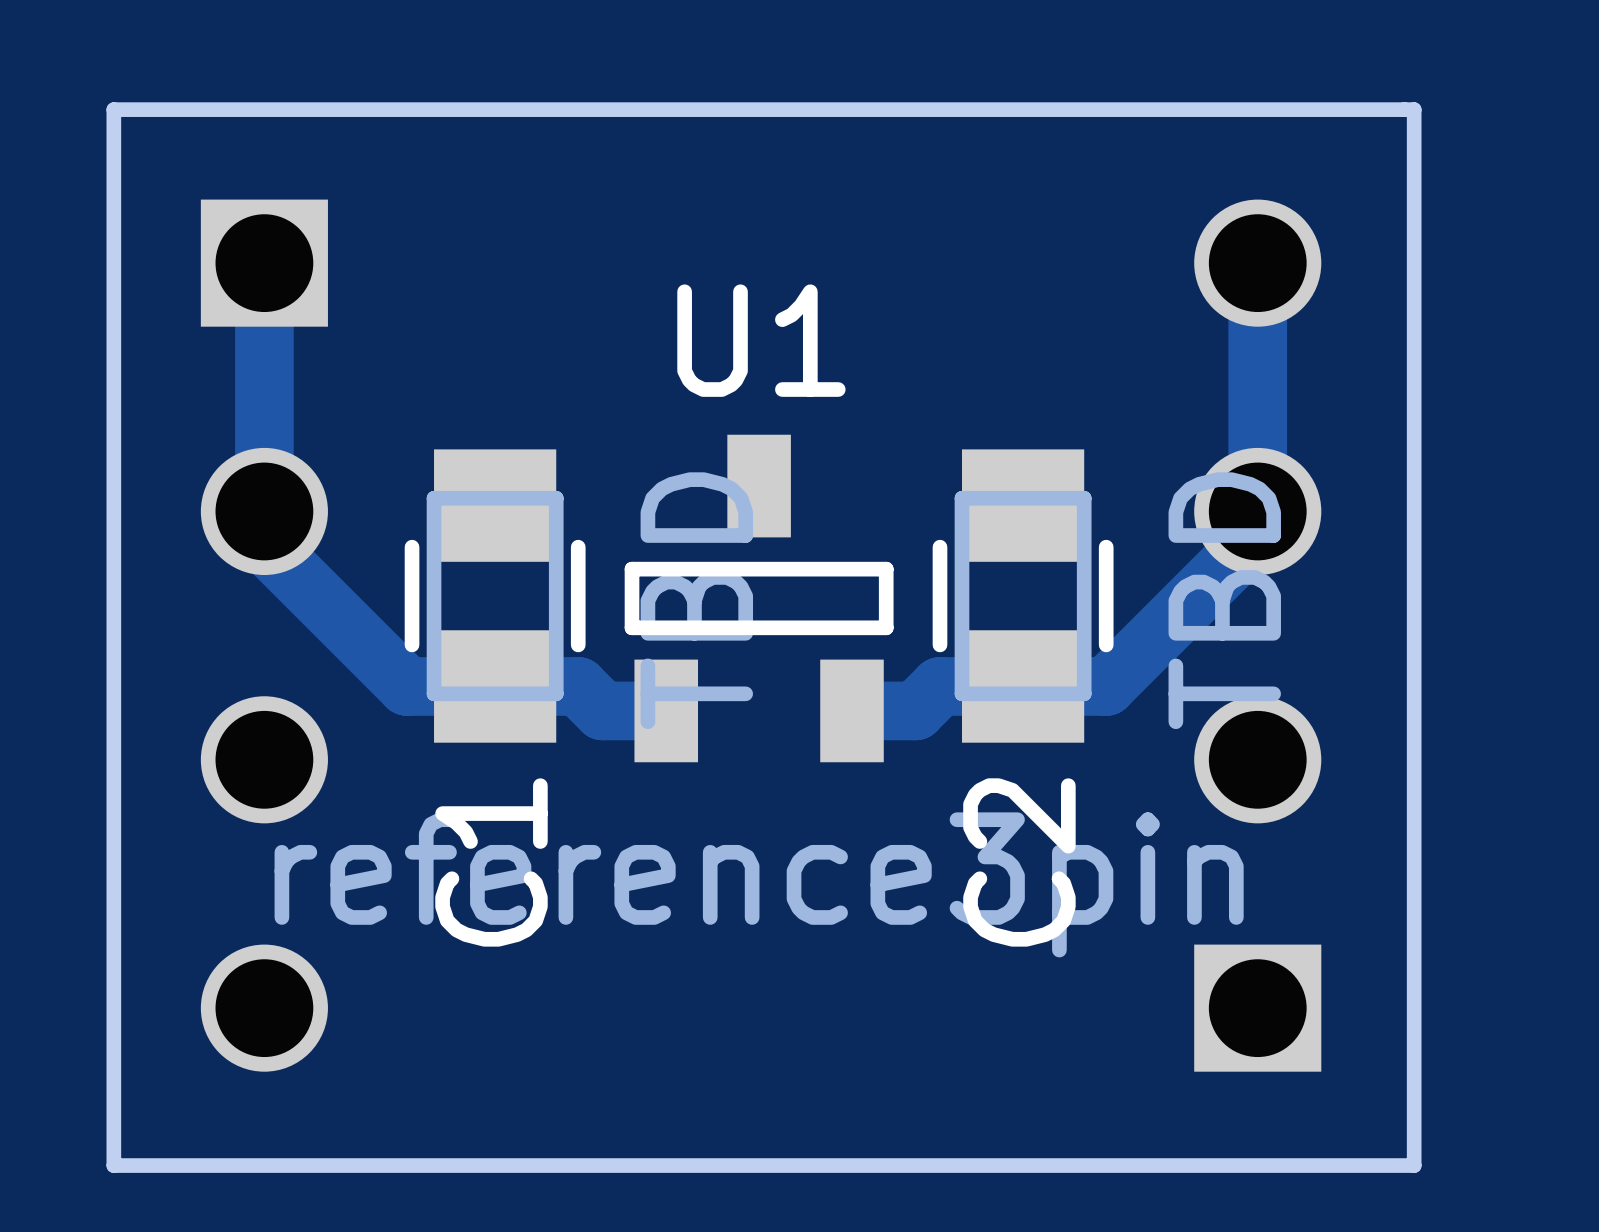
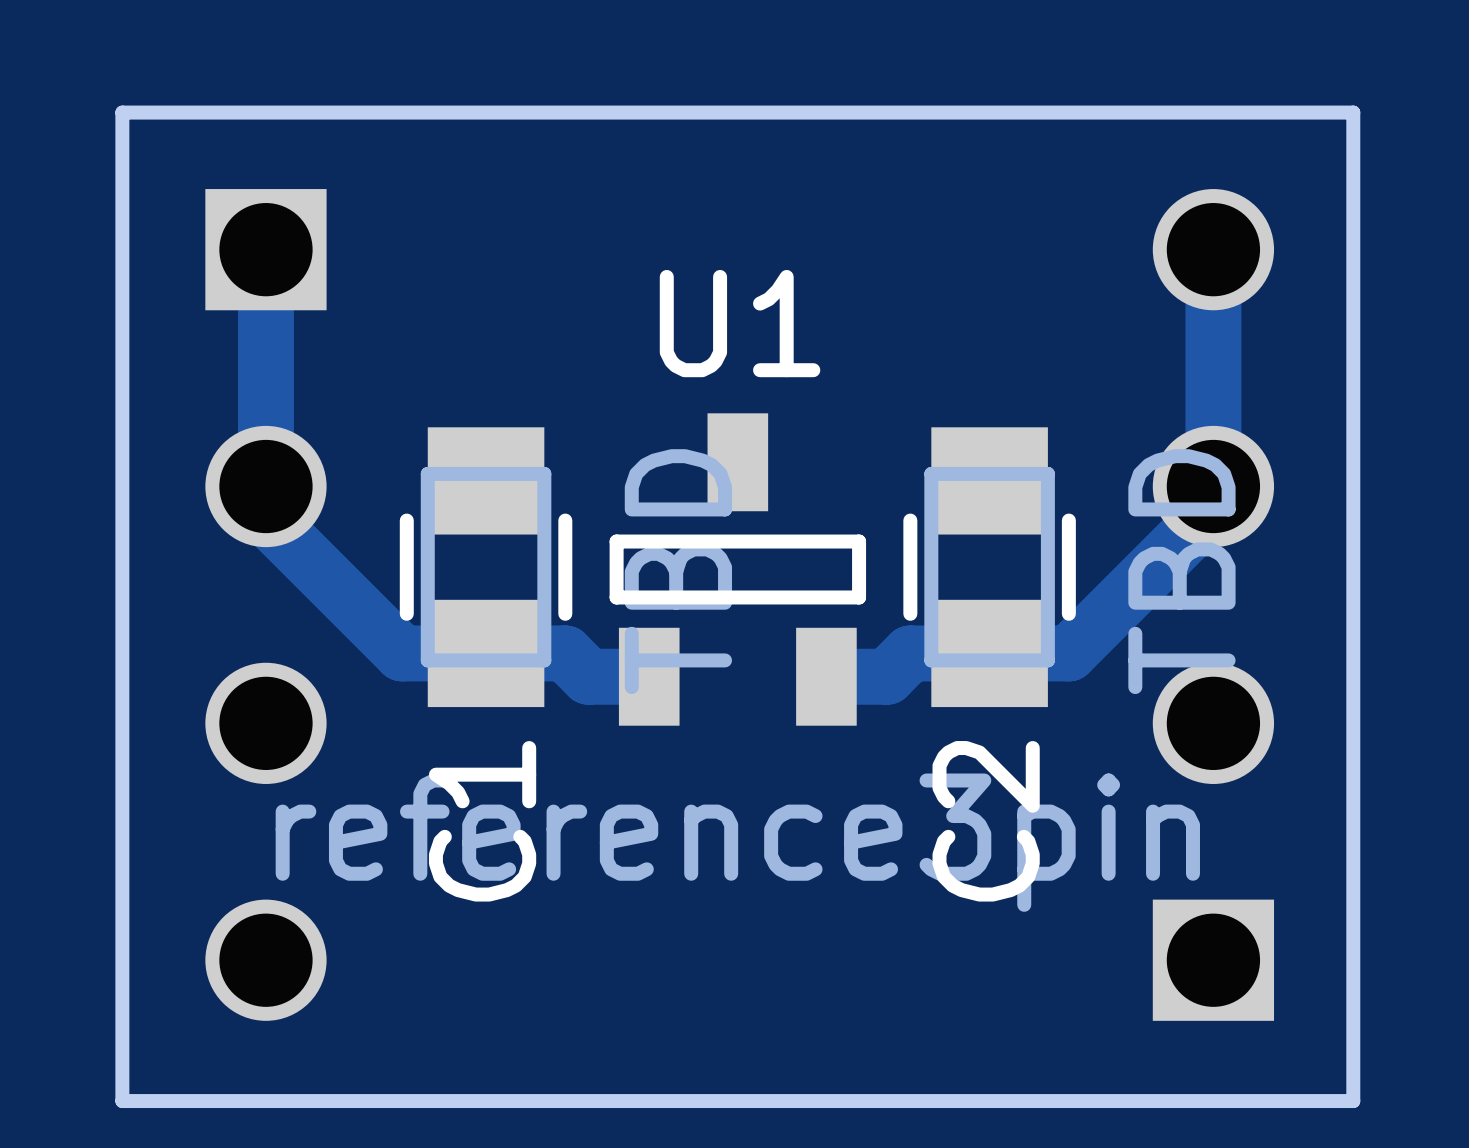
board edge: (113, 119) (113, 109) (1414, 109) (1414, 1165) (113, 1165) (113, 1155) -> (122, 112) (1353, 112) (1353, 1101) (122, 1101)

